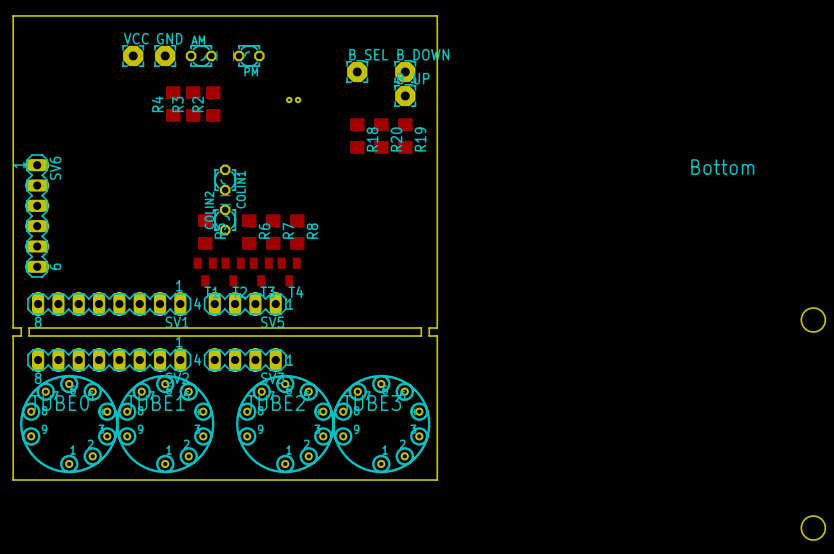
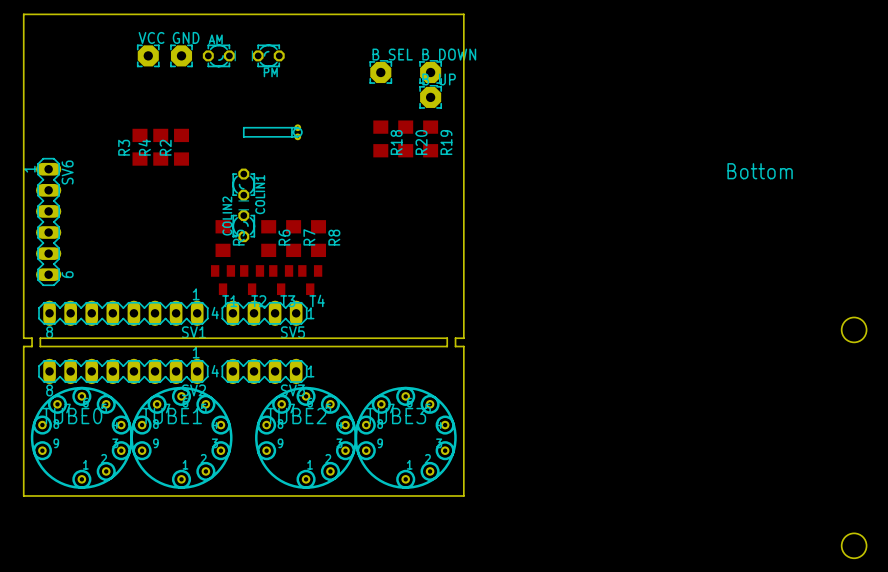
part side: bottom (293, 99) -> top (272, 132)
R4 position: (173, 103) -> (160, 147)
R3 position: (193, 103) -> (139, 147)
R2 position: (213, 103) -> (181, 147)

